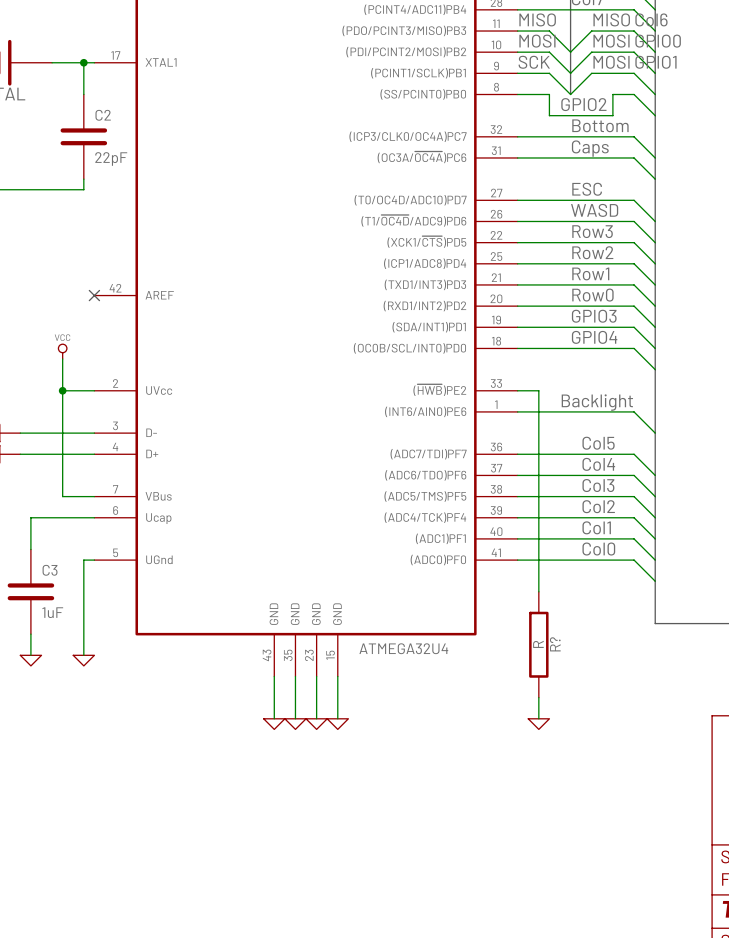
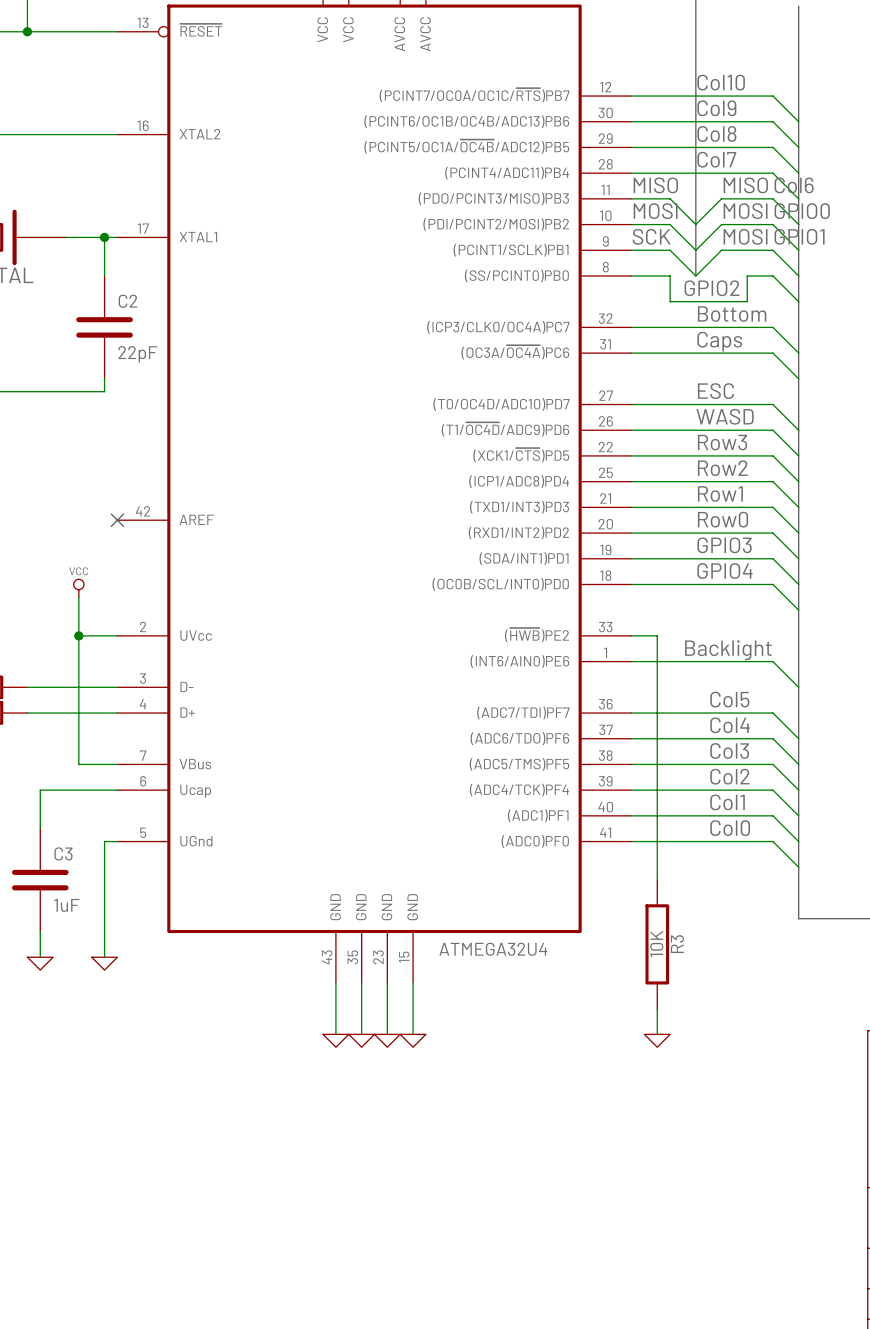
R? value: R (538, 644) -> 10K (656, 944)
R? name: R? (555, 644) -> R3 (677, 944)

